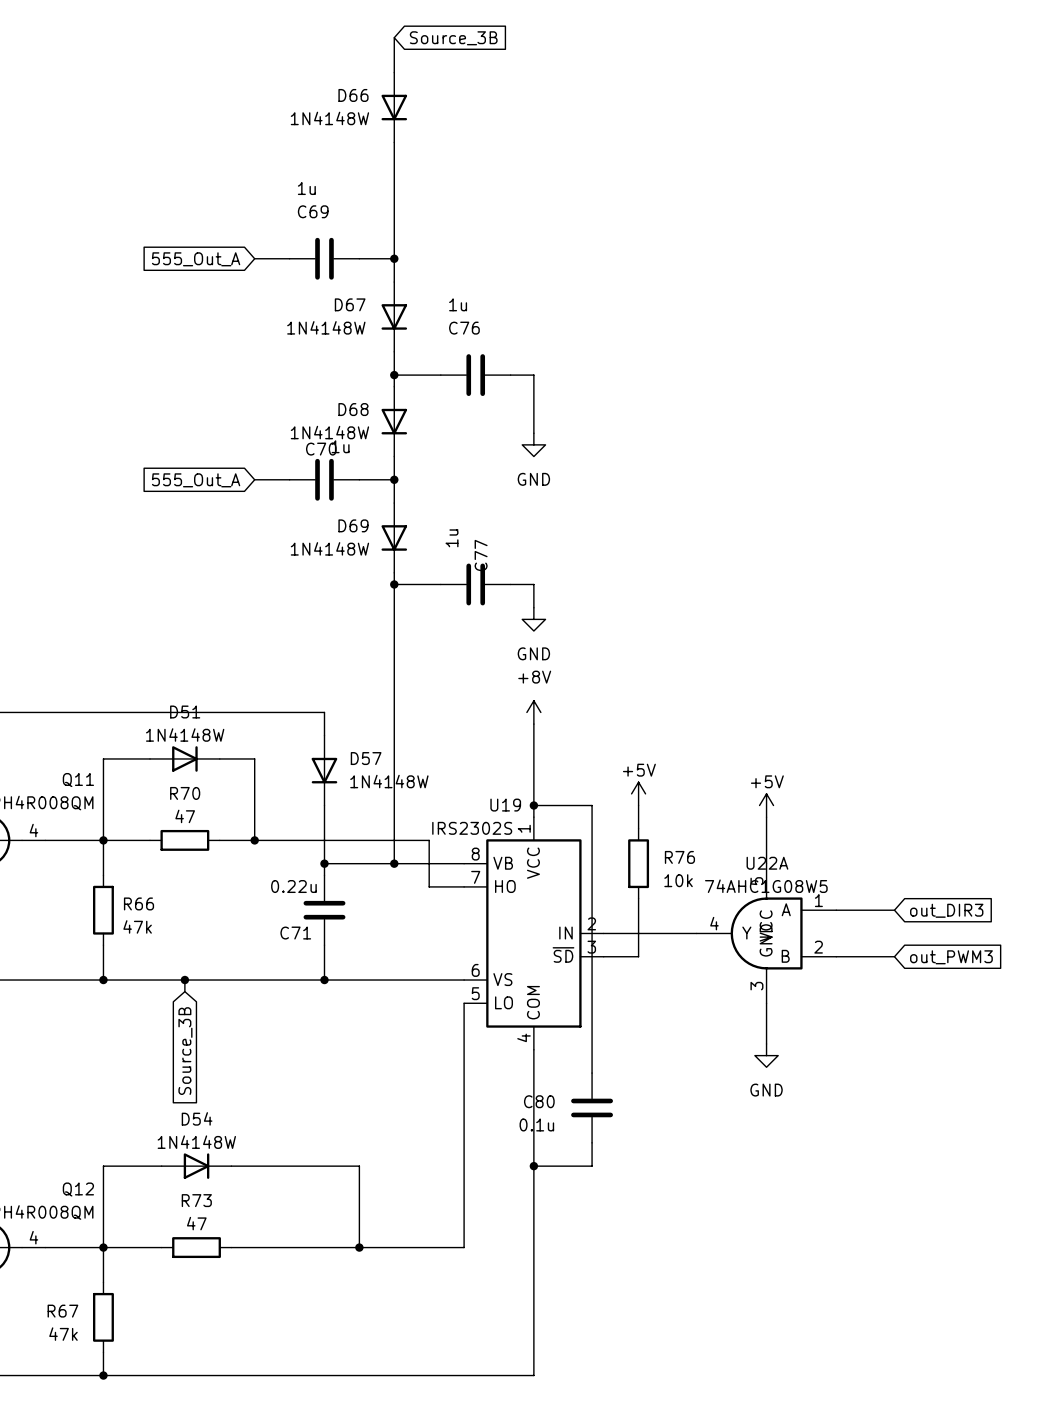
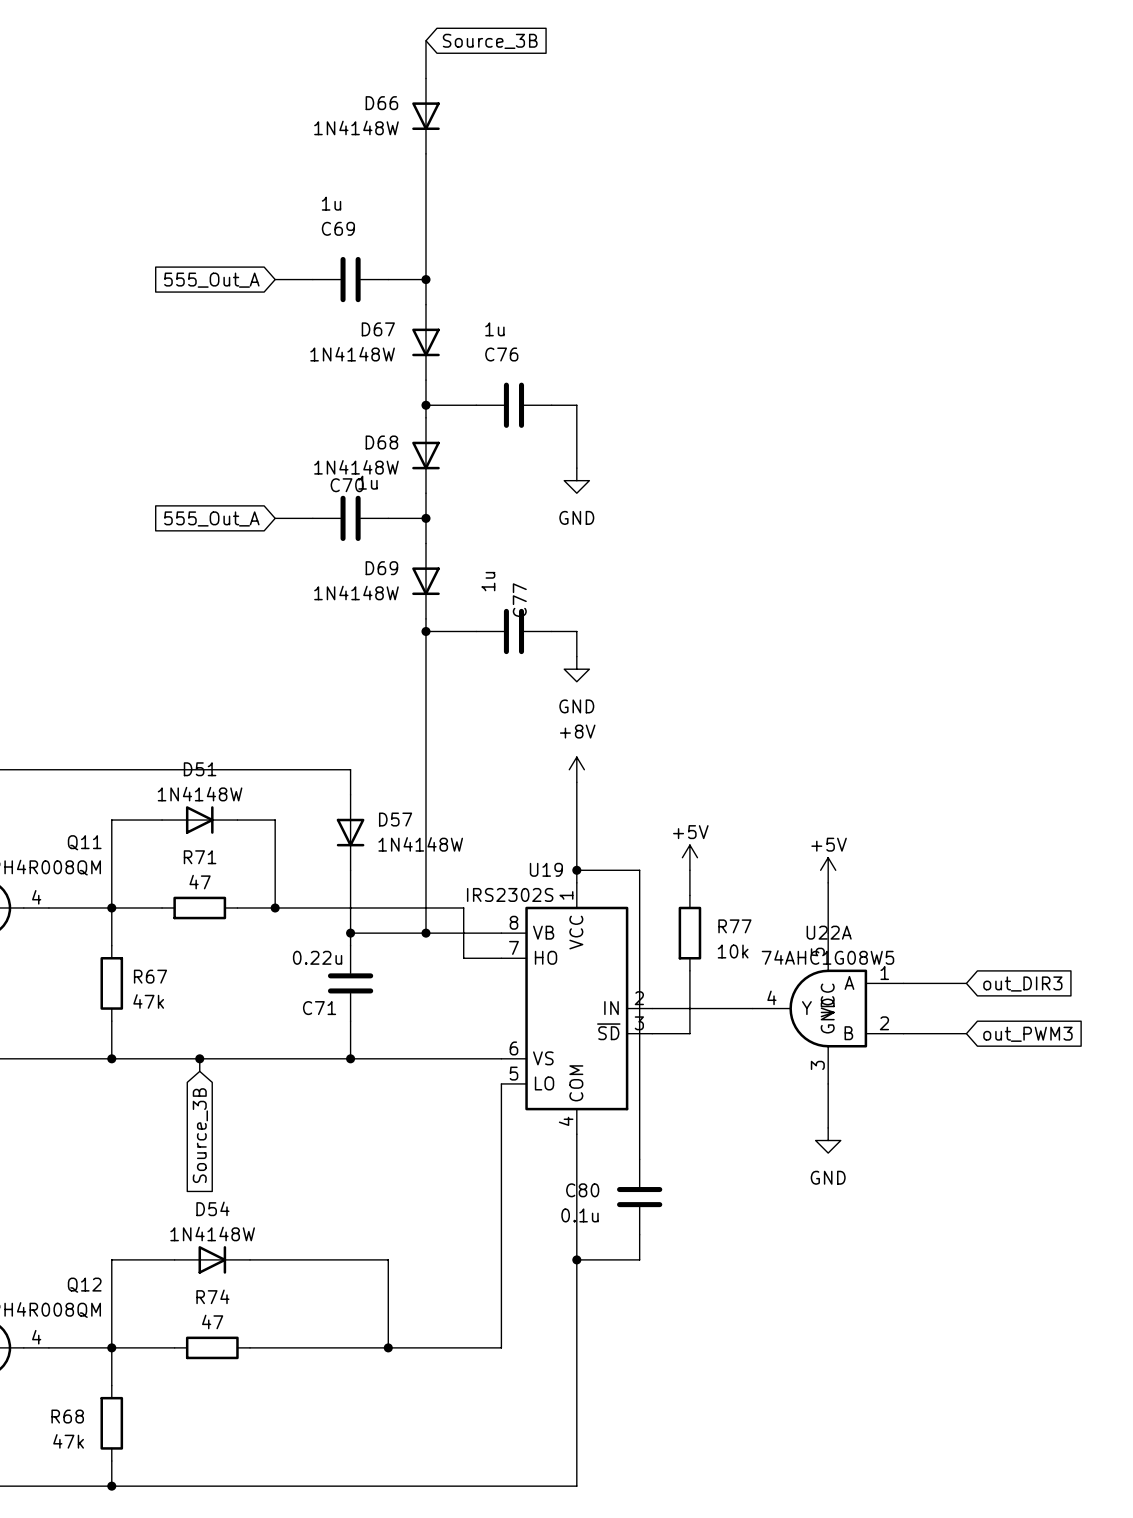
R70 name: R70 (185, 793) -> R71 (200, 857)
R76 name: R76 (679, 857) -> R77 (734, 926)
R66 name: R66 (139, 903) -> R67 (150, 976)
R73 name: R73 (196, 1200) -> R74 (212, 1296)
R67 name: R67 (62, 1311) -> R68 (67, 1416)

